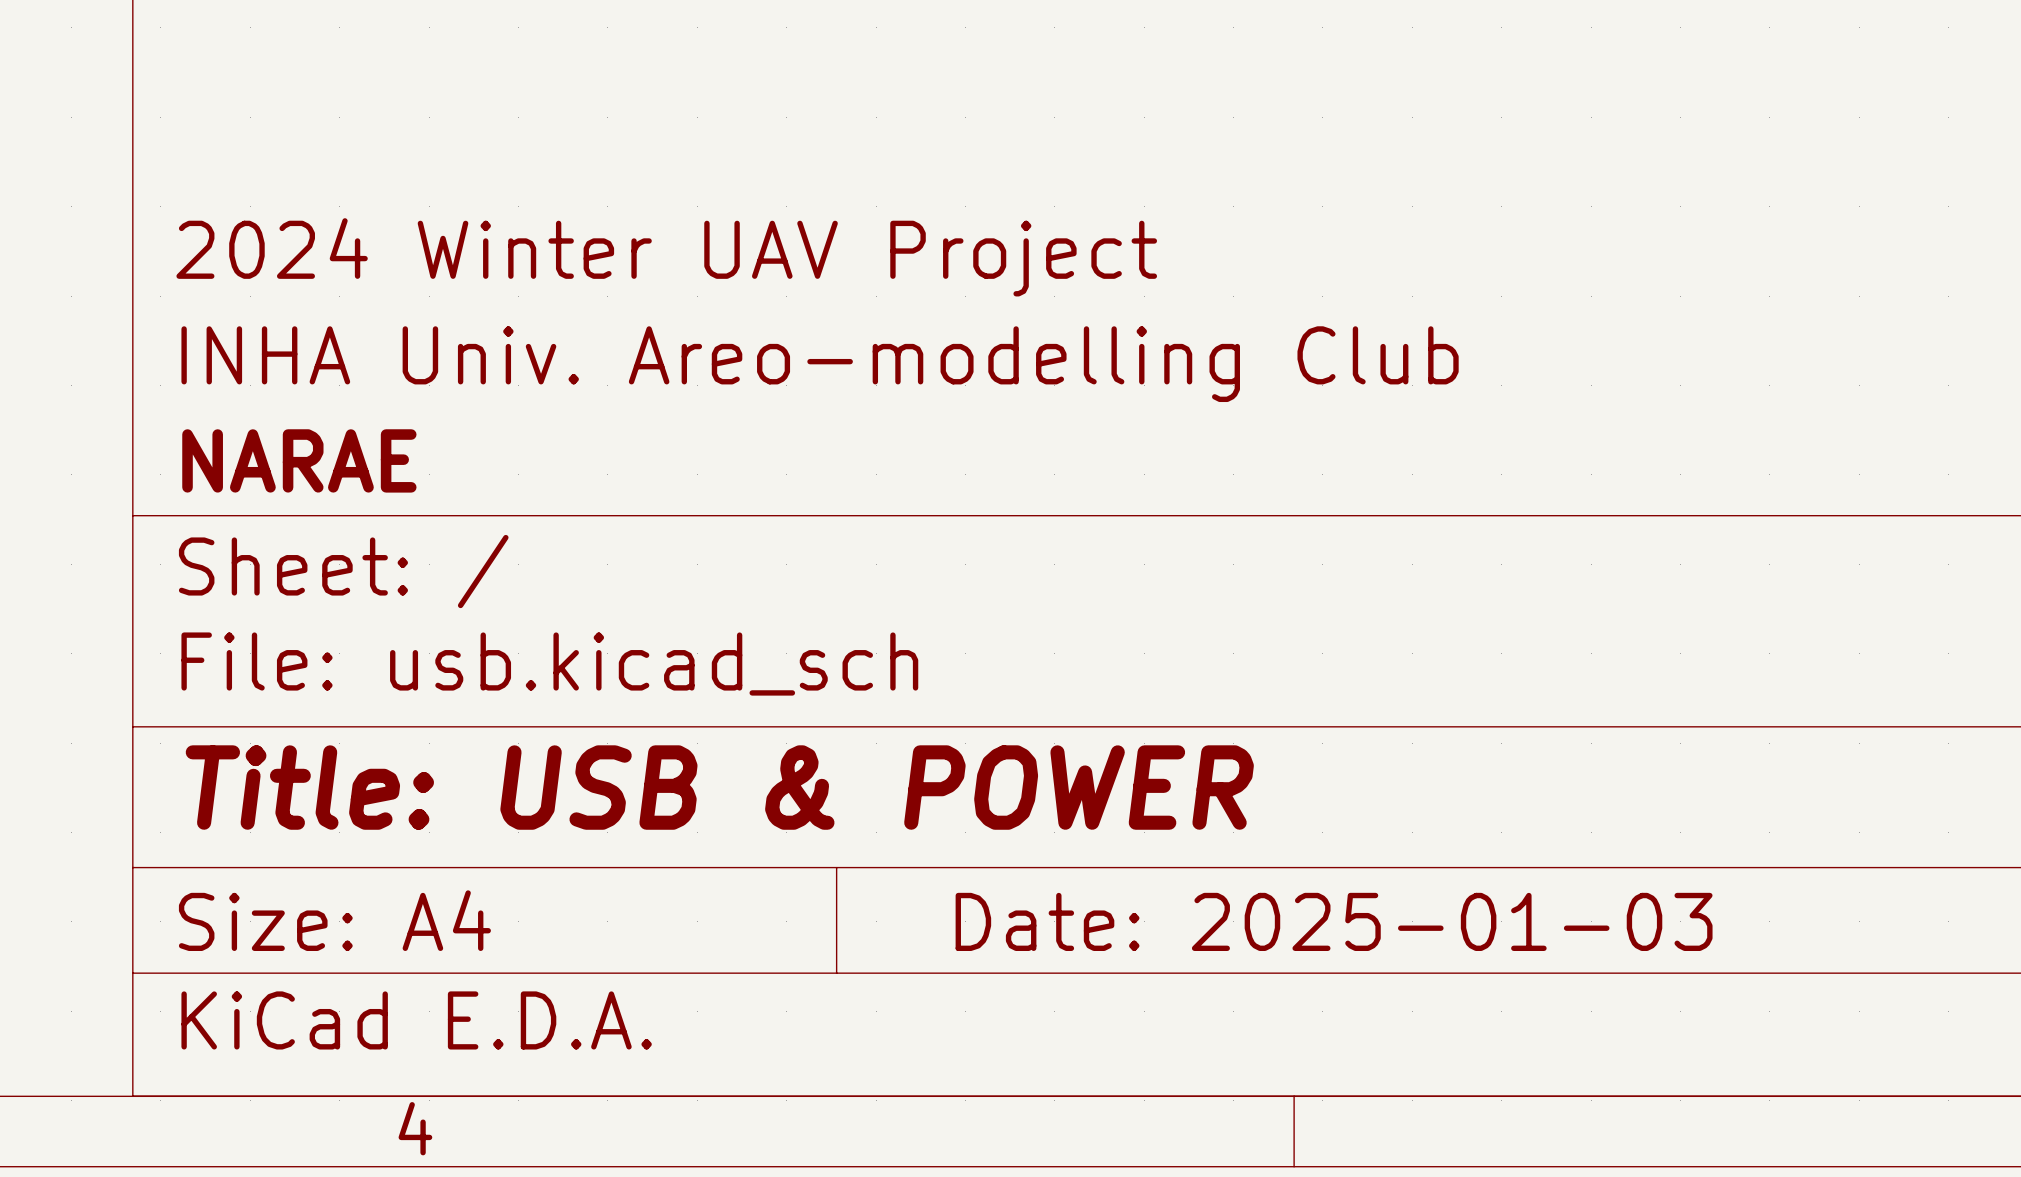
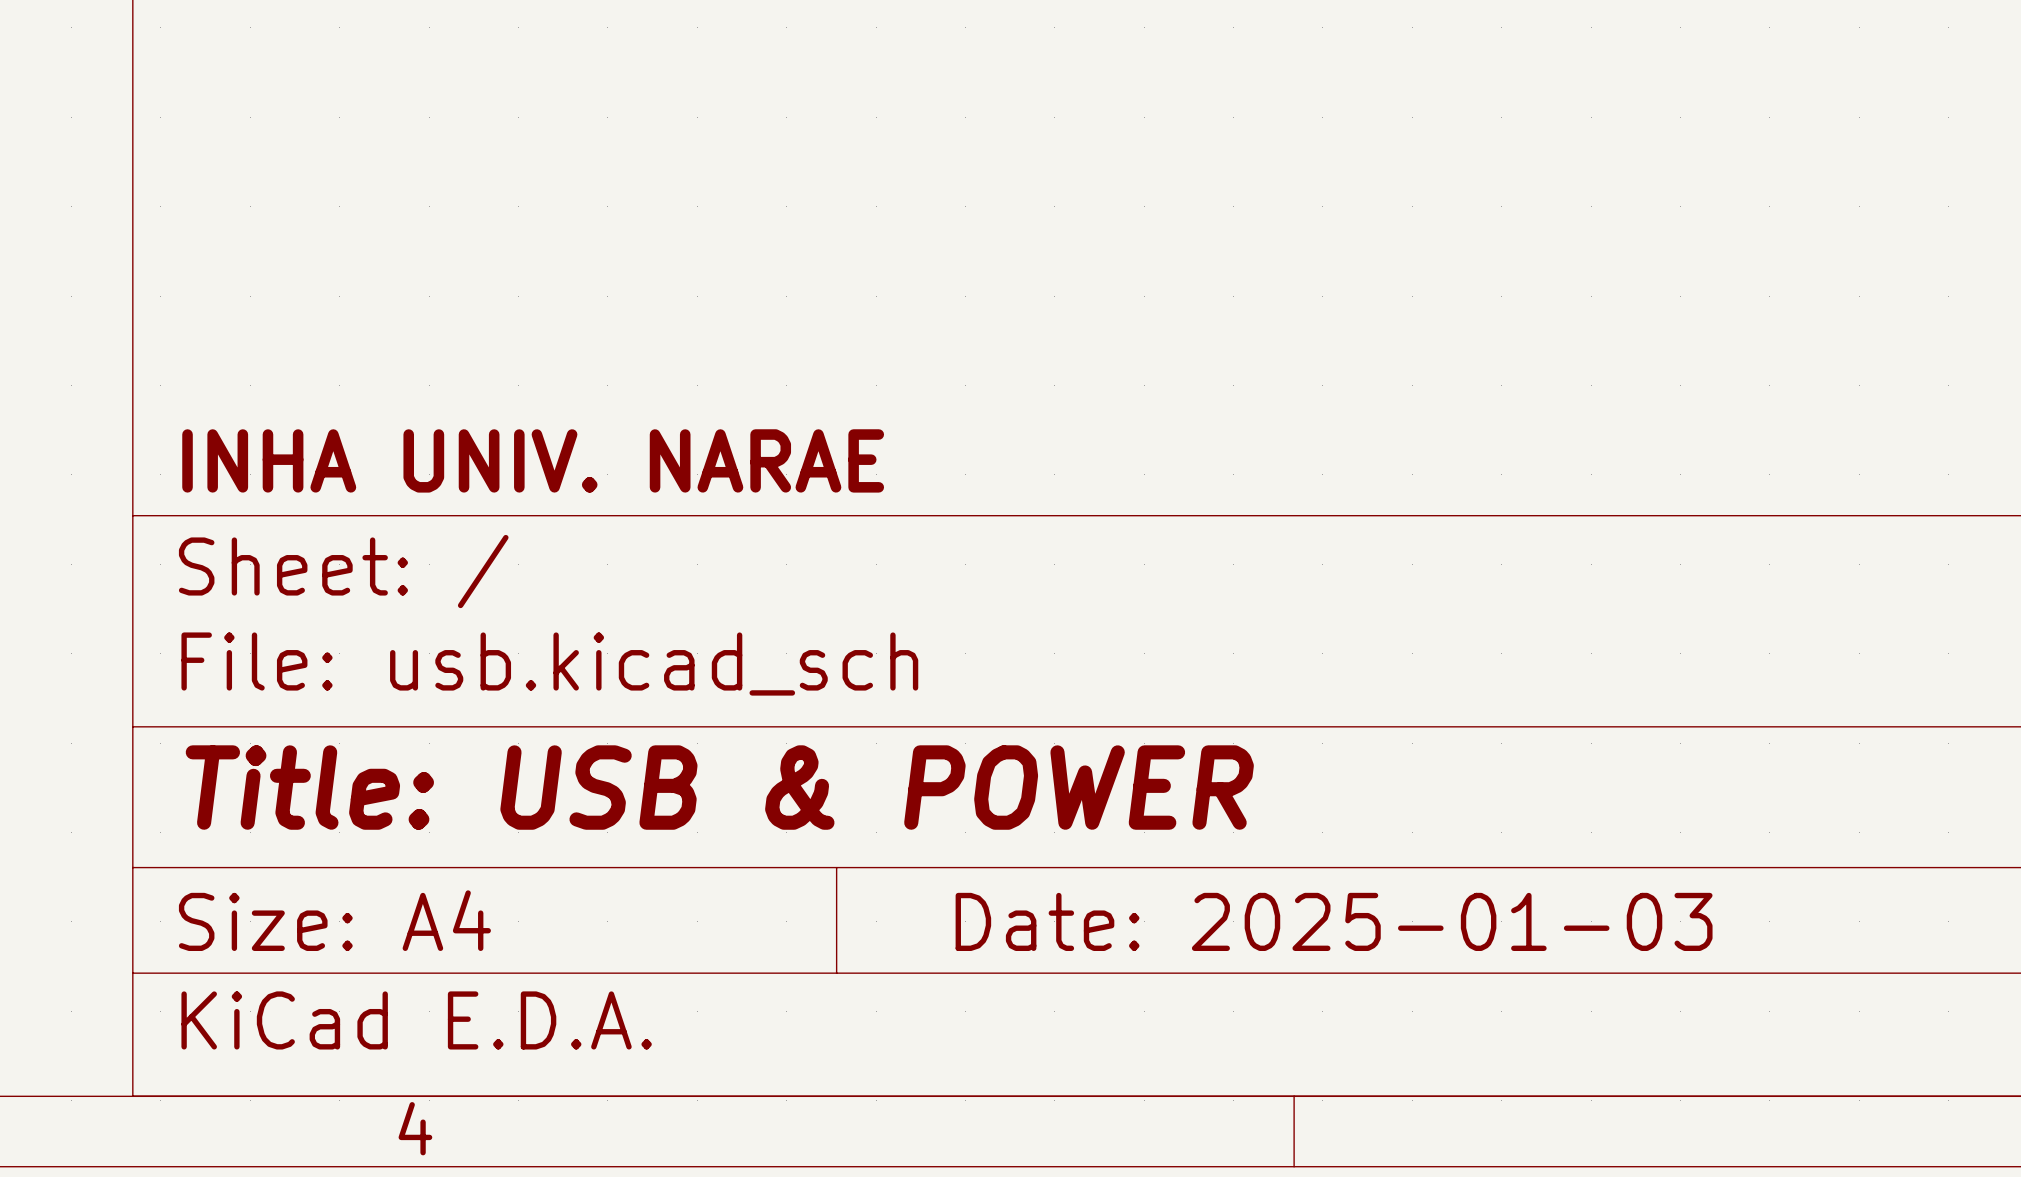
title block: 2024 Winter UAV Project (666, 257) -> none
title block: INHA Univ. Areo-modelling Club (820, 364) -> none
title block: NARAE (299, 460) -> INHA UNIV. NARAE (533, 460)

